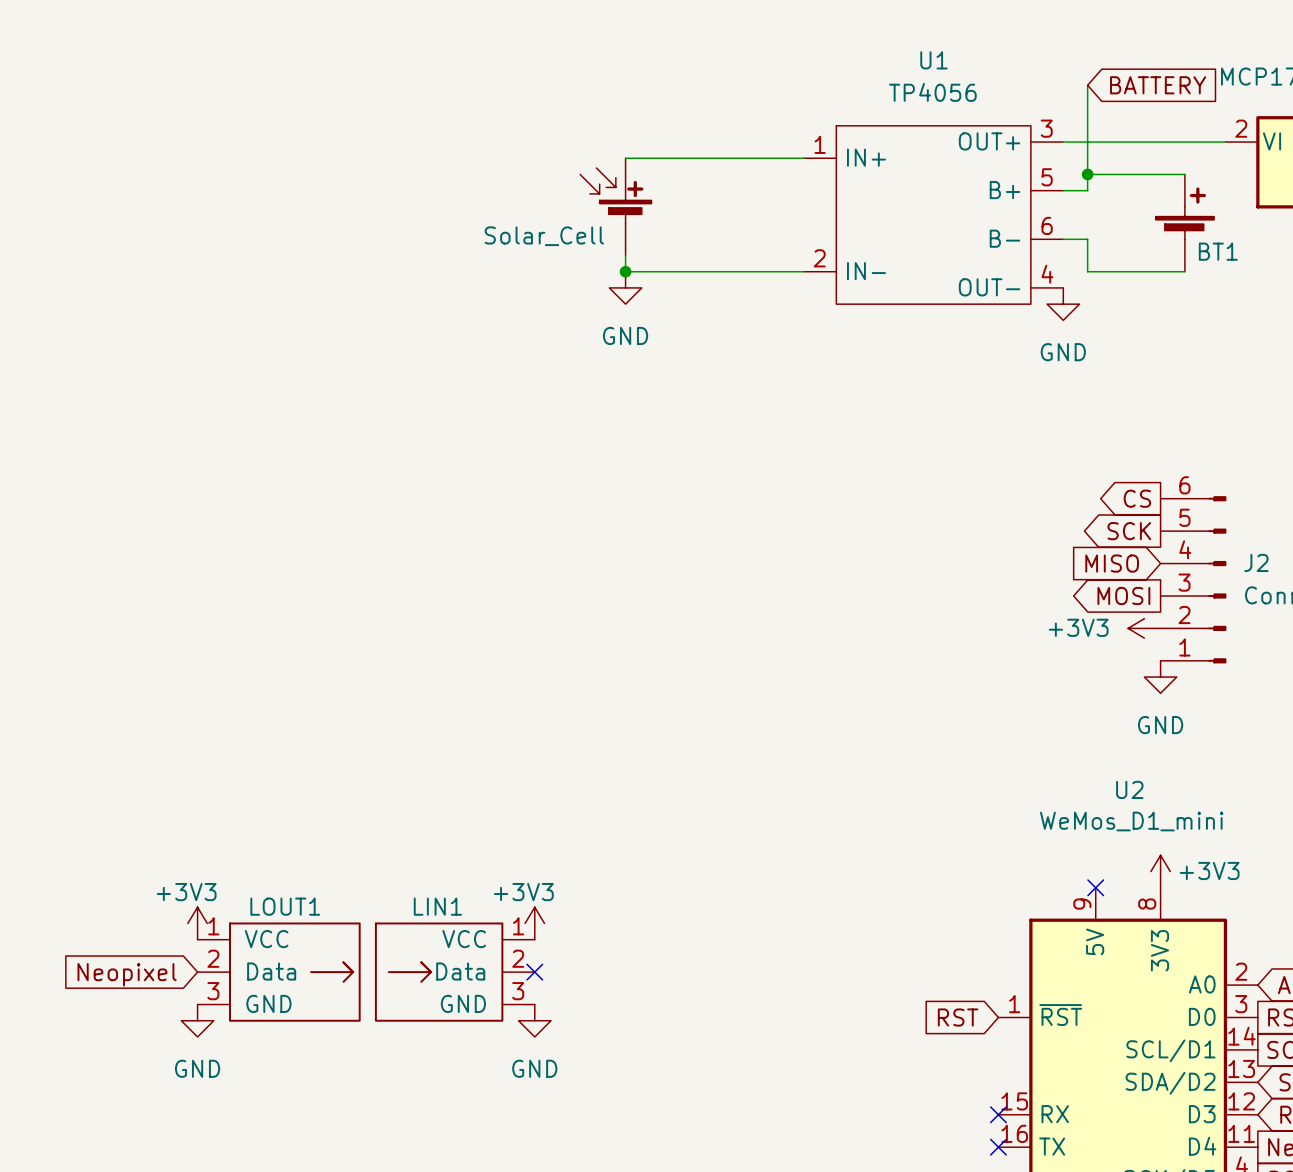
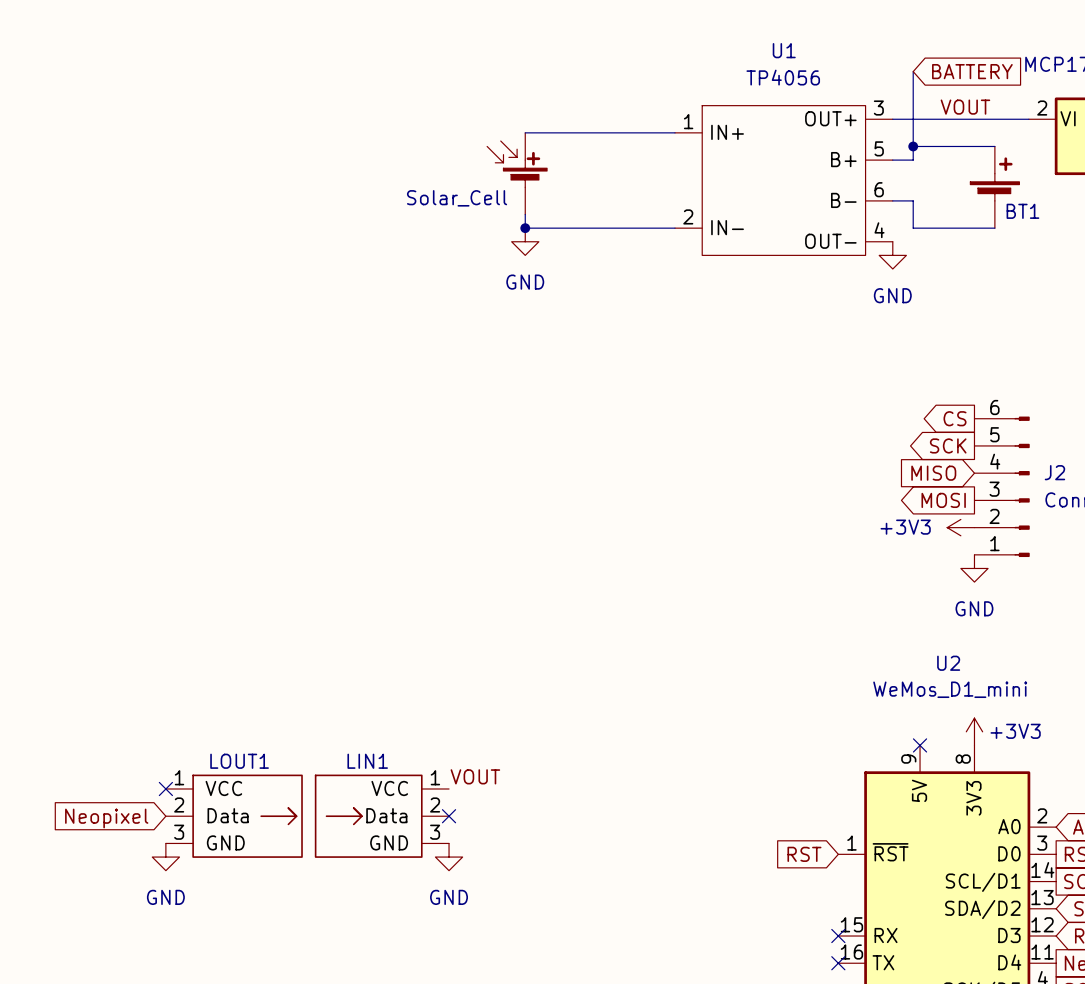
label: none -> VOUT (965, 107)
power symbol: +3V3 (197, 923) -> none
power symbol: +3V3 (534, 923) -> none
label: none -> VOUT (475, 776)
no-connect mark: none -> (165, 788)

